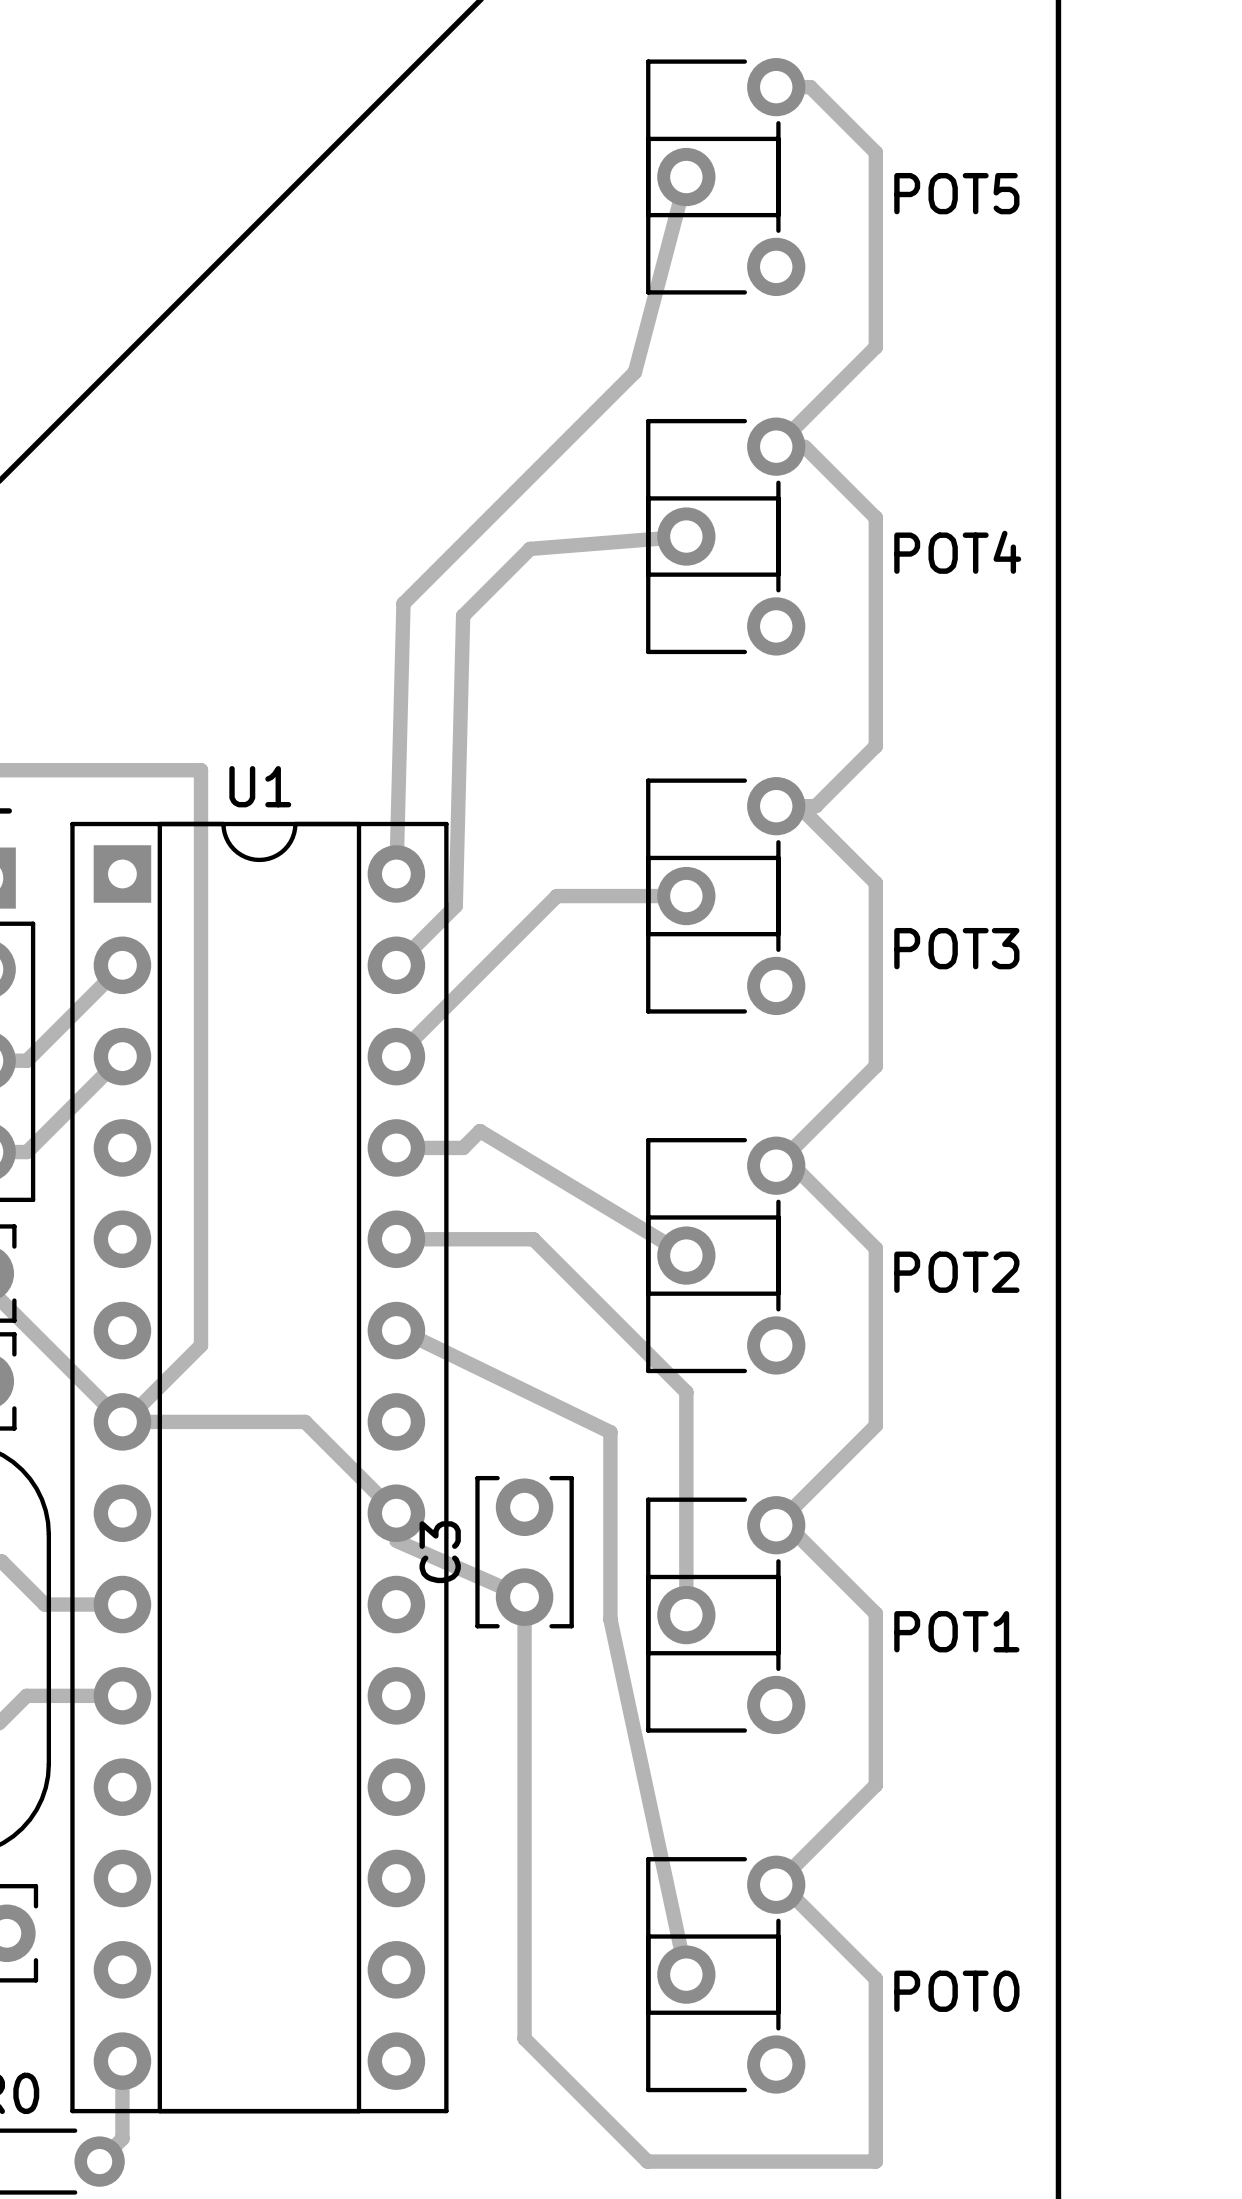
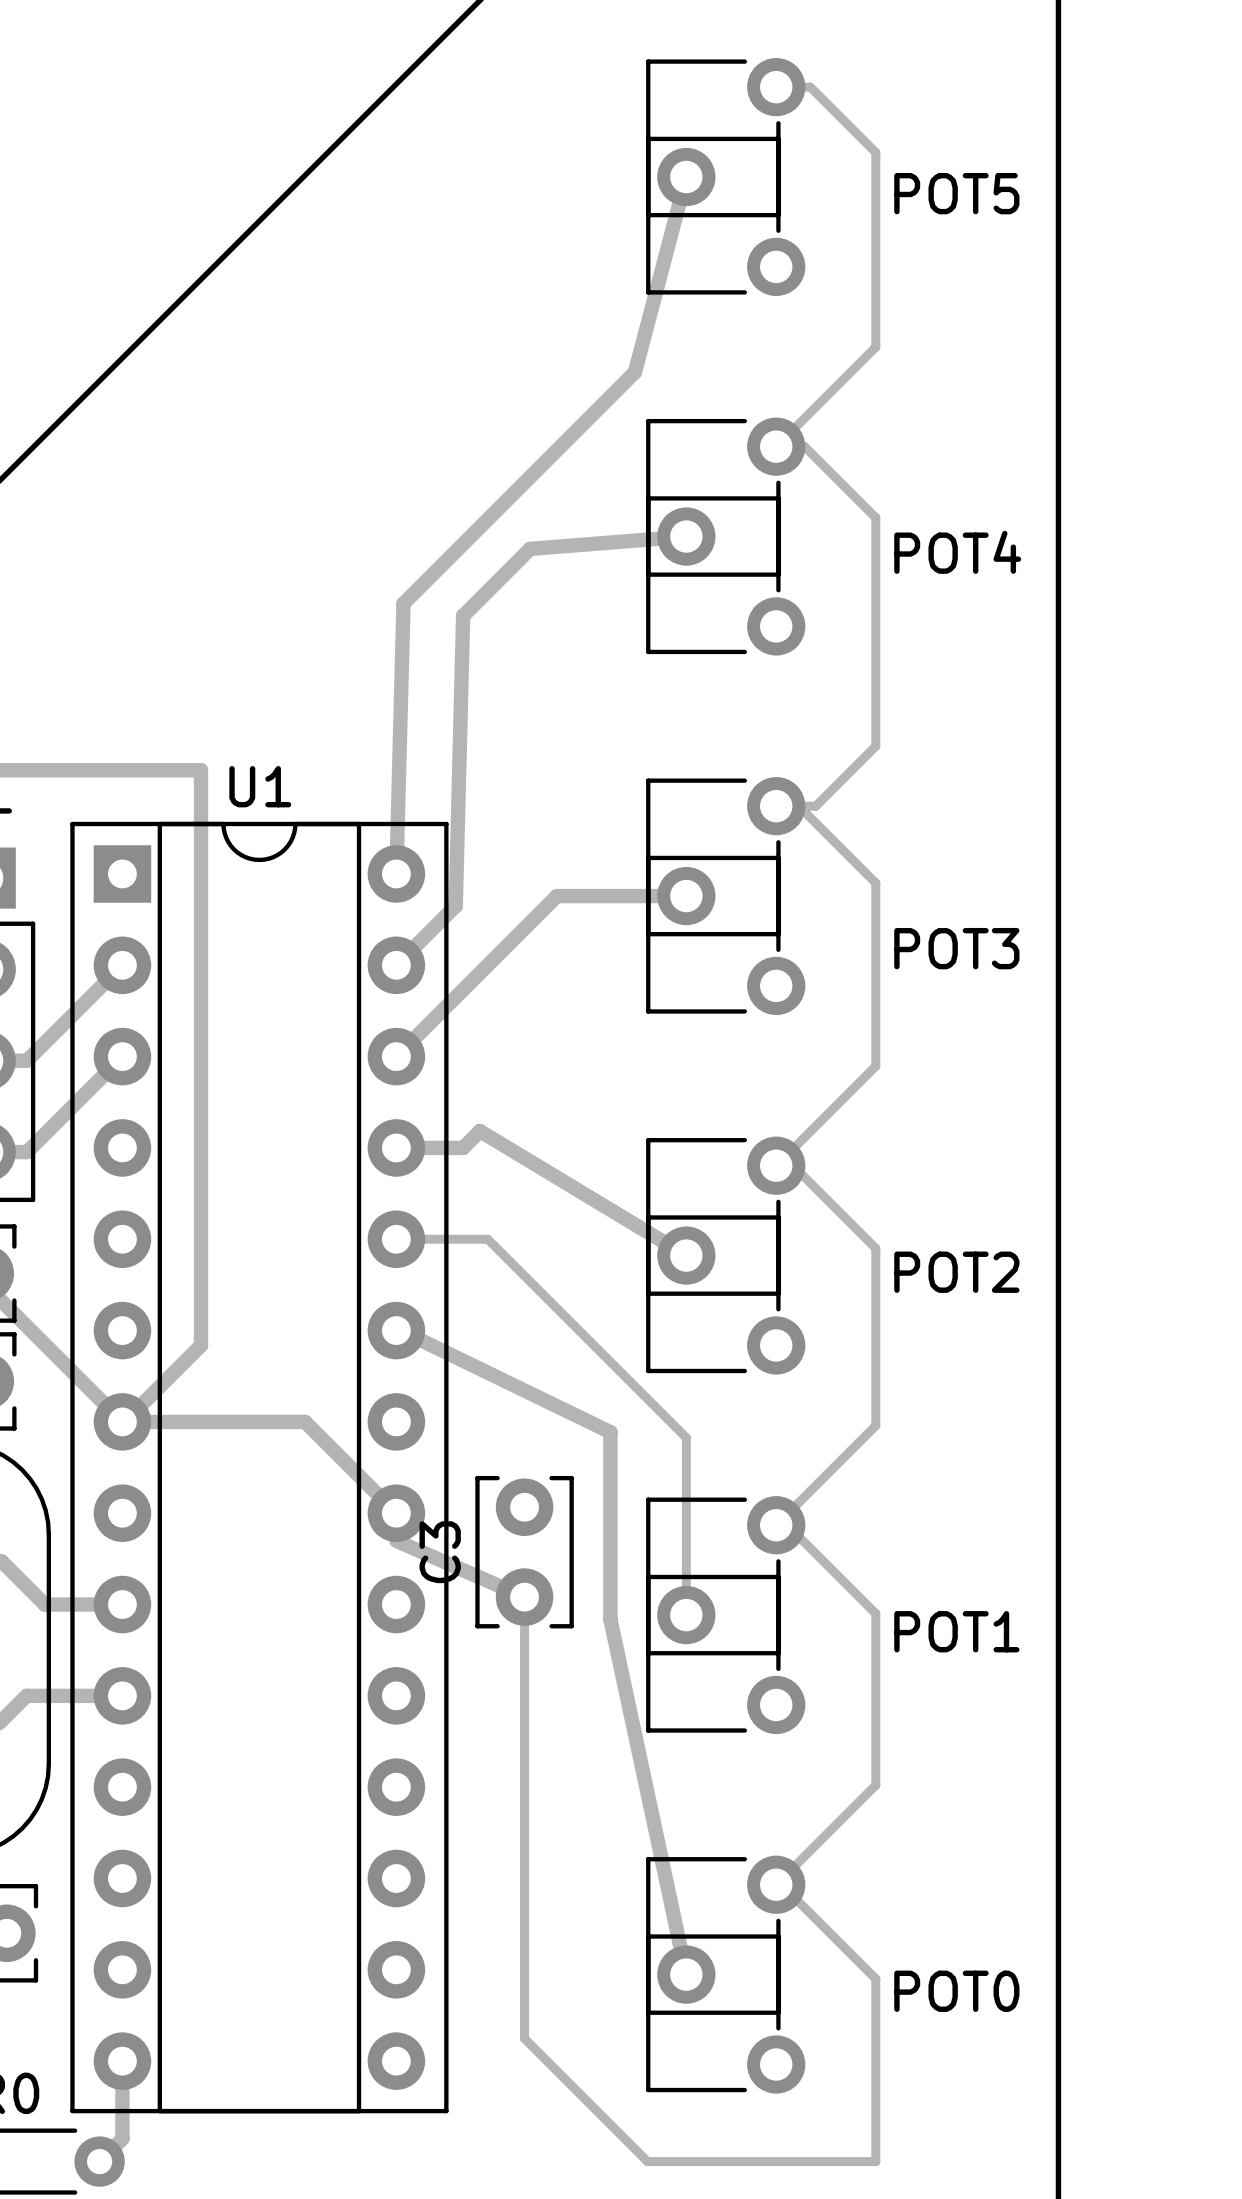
track width: thick (776, 87) (810, 87) (875, 152) (875, 347) (776, 446) -> thin (776, 87) (810, 87) (875, 152) (875, 347) (776, 446)
track width: thick (804, 446) (875, 517) (875, 746) (815, 806) (798, 806) (875, 883) (875, 1066) (776, 1165) -> thin (804, 446) (875, 517) (875, 746) (815, 806) (798, 806) (875, 883) (875, 1066) (776, 1165)
track width: thick (793, 1165) (875, 1248) (875, 1425) (776, 1525) -> thin (793, 1165) (875, 1248) (875, 1425) (776, 1525)
track width: thick (396, 1239) (487, 1239) -> thin (396, 1239) (487, 1239)
track: (487, 1239) (533, 1239) (686, 1392) (686, 1437) -> (487, 1239) (686, 1437)
track width: thick (686, 1437) (686, 1615) -> thin (686, 1437) (686, 1615)
track width: thick (787, 1525) (875, 1613) (875, 1785) (776, 1884) -> thin (787, 1525) (875, 1613) (875, 1785) (776, 1884)
track width: thick (524, 1597) (524, 2038) (647, 2161) (875, 2161) (875, 1978) (781, 1884) -> thin (524, 1597) (524, 2038) (647, 2161) (875, 2161) (875, 1978) (781, 1884)

